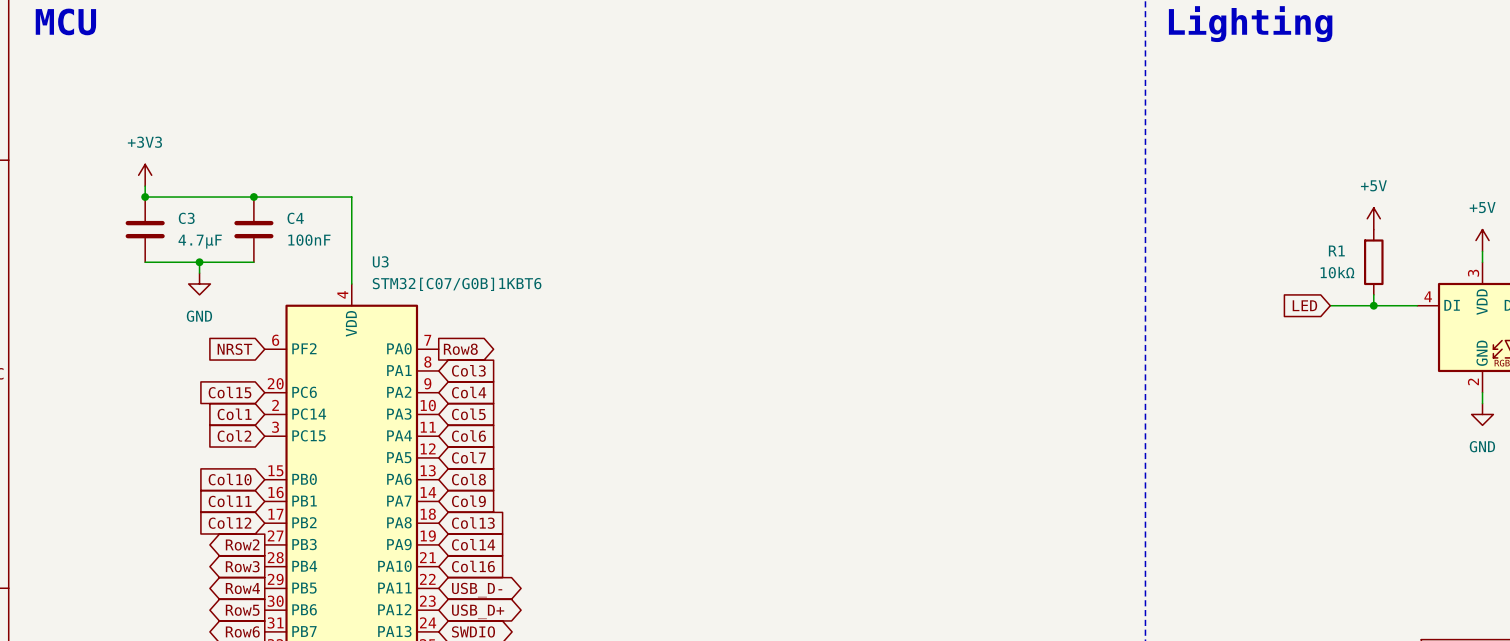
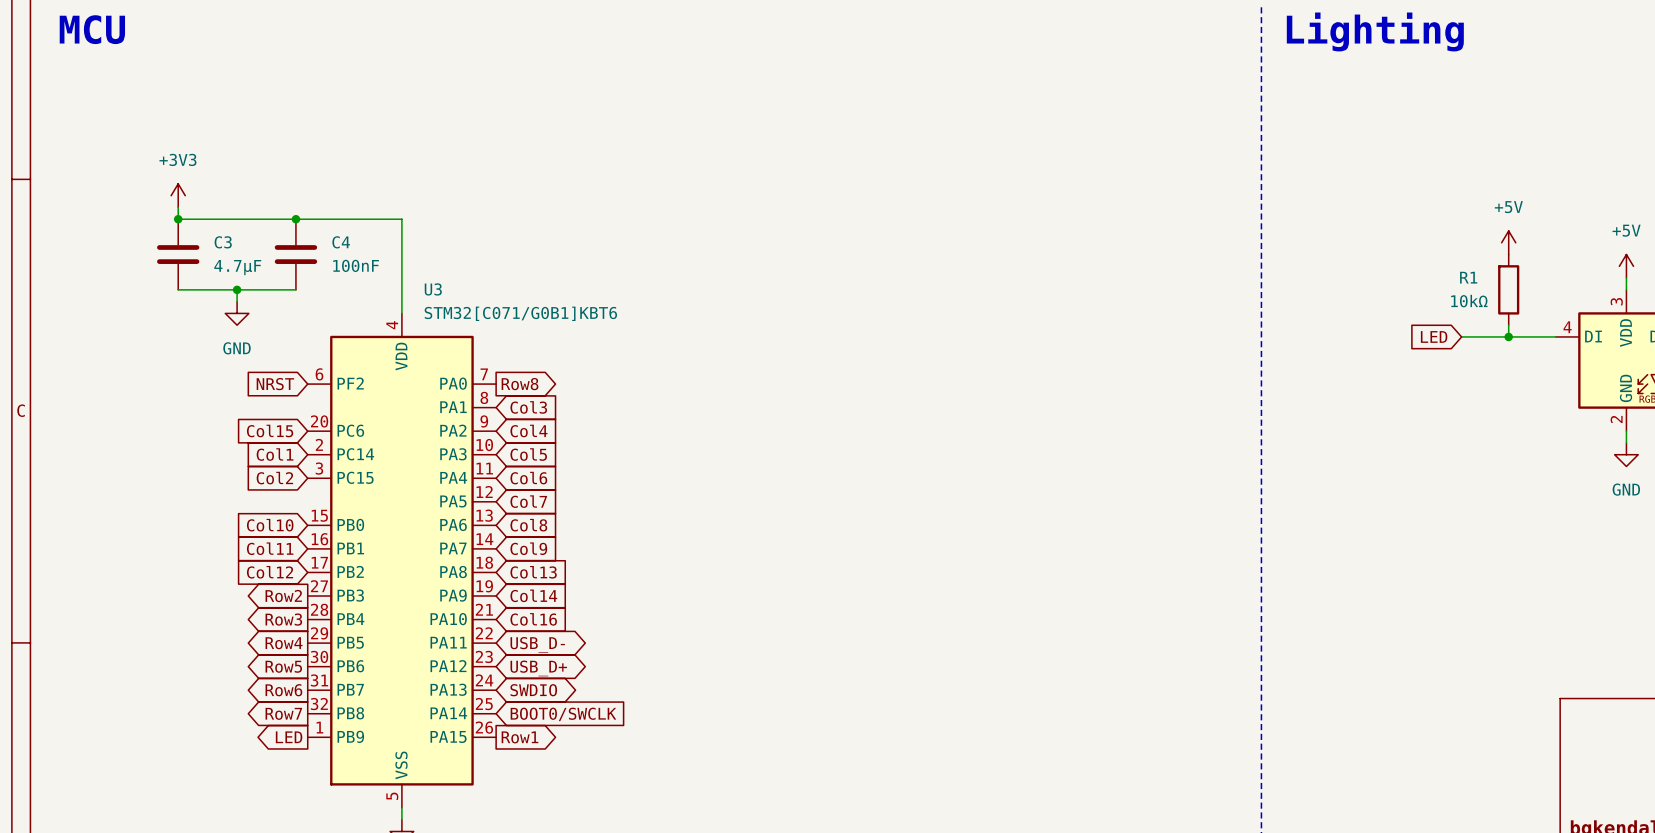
U3 value: STM32[C07/G0B]1KBT6 (457, 284) -> STM32[C071/G0B1]KBT6 (520, 313)

